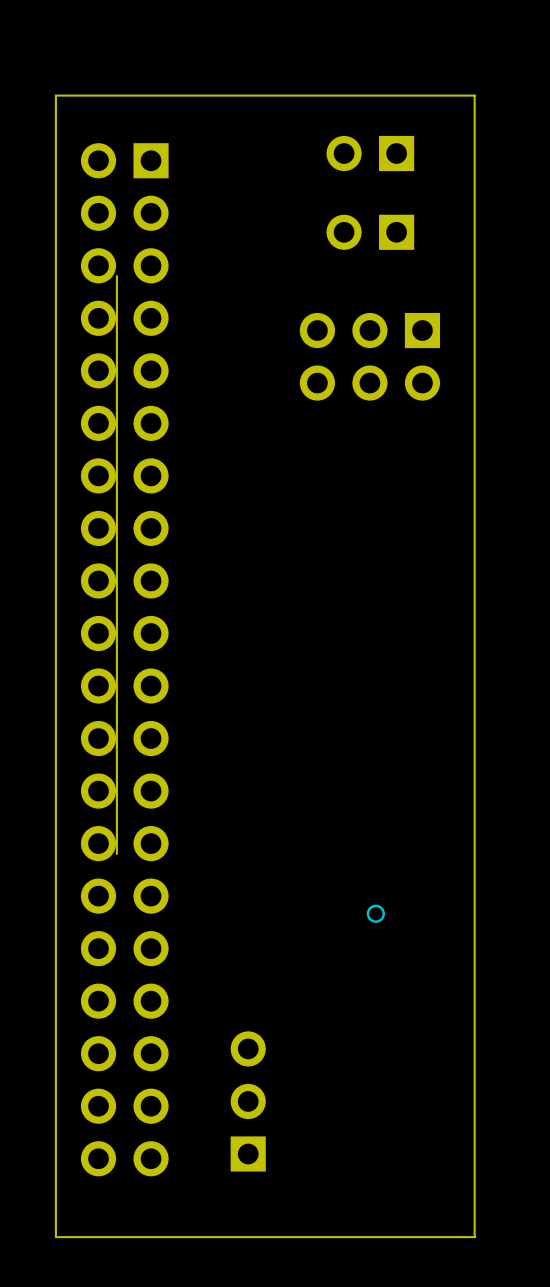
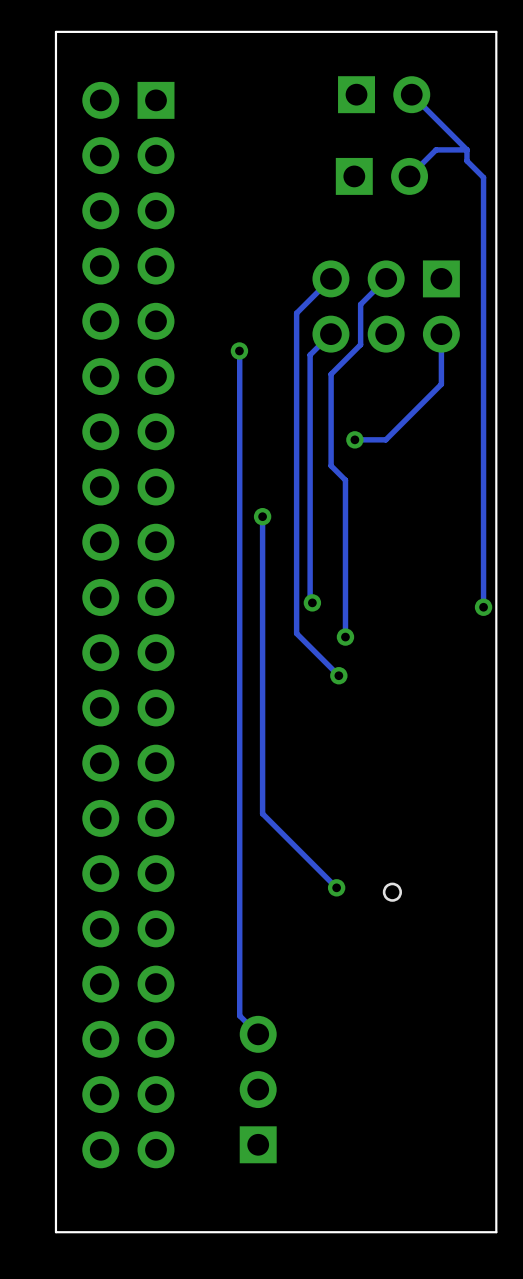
part rotation: 0° (370, 153) -> 180° (384, 94)
track: none -> (411, 94) (466, 149)
track: none -> (466, 149) (466, 160) (483, 177) (483, 607)
track: none -> (466, 149) (436, 149) (409, 176)
part rotation: 0° (370, 232) -> 180° (381, 176)
board edge: (116, 276) (116, 853) -> none
track: none -> (330, 278) (296, 313) (296, 633) (338, 675)
track: none -> (386, 278) (360, 304) (360, 344) (331, 374) (331, 465) (345, 480) (345, 637)
track: none -> (330, 334) (310, 354) (310, 600) (312, 602)
track: none -> (441, 334) (441, 384) (385, 439) (354, 439)
via: none -> (239, 350)
track: none -> (239, 352) (239, 1015) (258, 1034)
via: none -> (354, 439)
track: none -> (262, 516) (262, 813) (338, 890)
via: none -> (262, 516)
via: none -> (312, 602)
via: none -> (483, 607)
via: none -> (345, 637)
via: none -> (338, 675)
via: none -> (336, 887)

